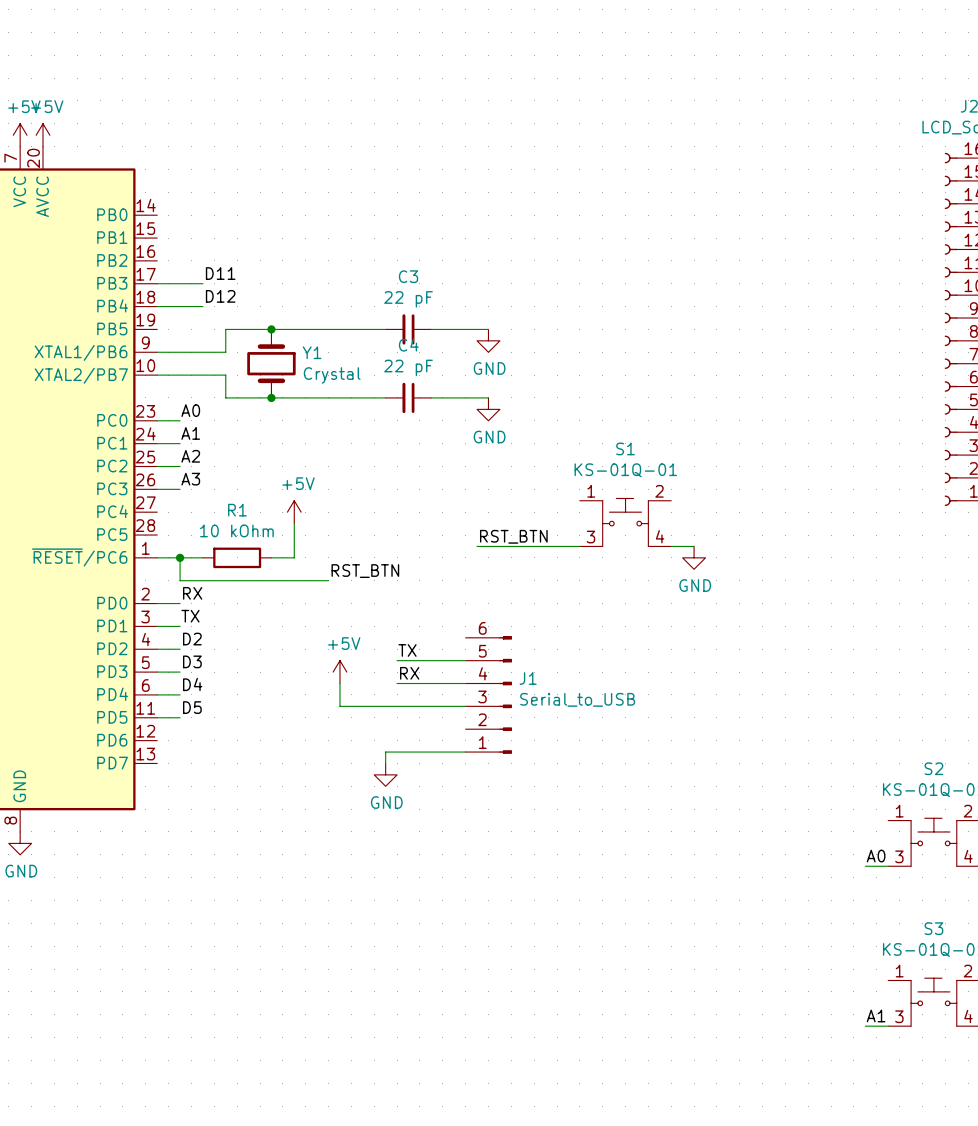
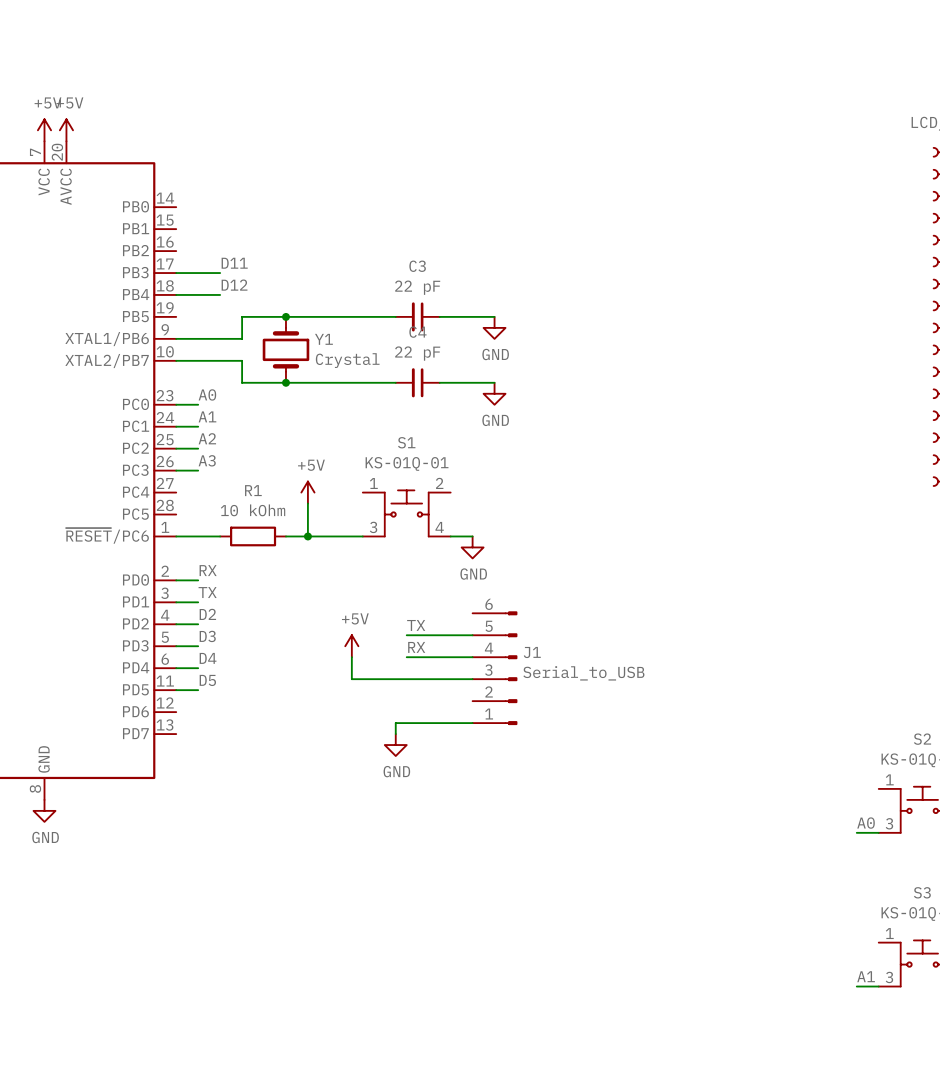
S1 position: (625, 522) -> (406, 513)
label: RST_BTN (513, 536) -> none
wire: (477, 546) (579, 546) -> none
wire: (671, 546) (694, 546) -> none
wire: (180, 557) (180, 580) (328, 580) -> none
junction: (180, 557) -> none
wire: none -> (307, 536) (362, 536)
junction: none -> (307, 536)
wire: none -> (450, 536) (472, 536)
power symbol: GND (694, 557) -> none
power symbol: none -> GND (472, 547)
label: RST_BTN (365, 571) -> none

